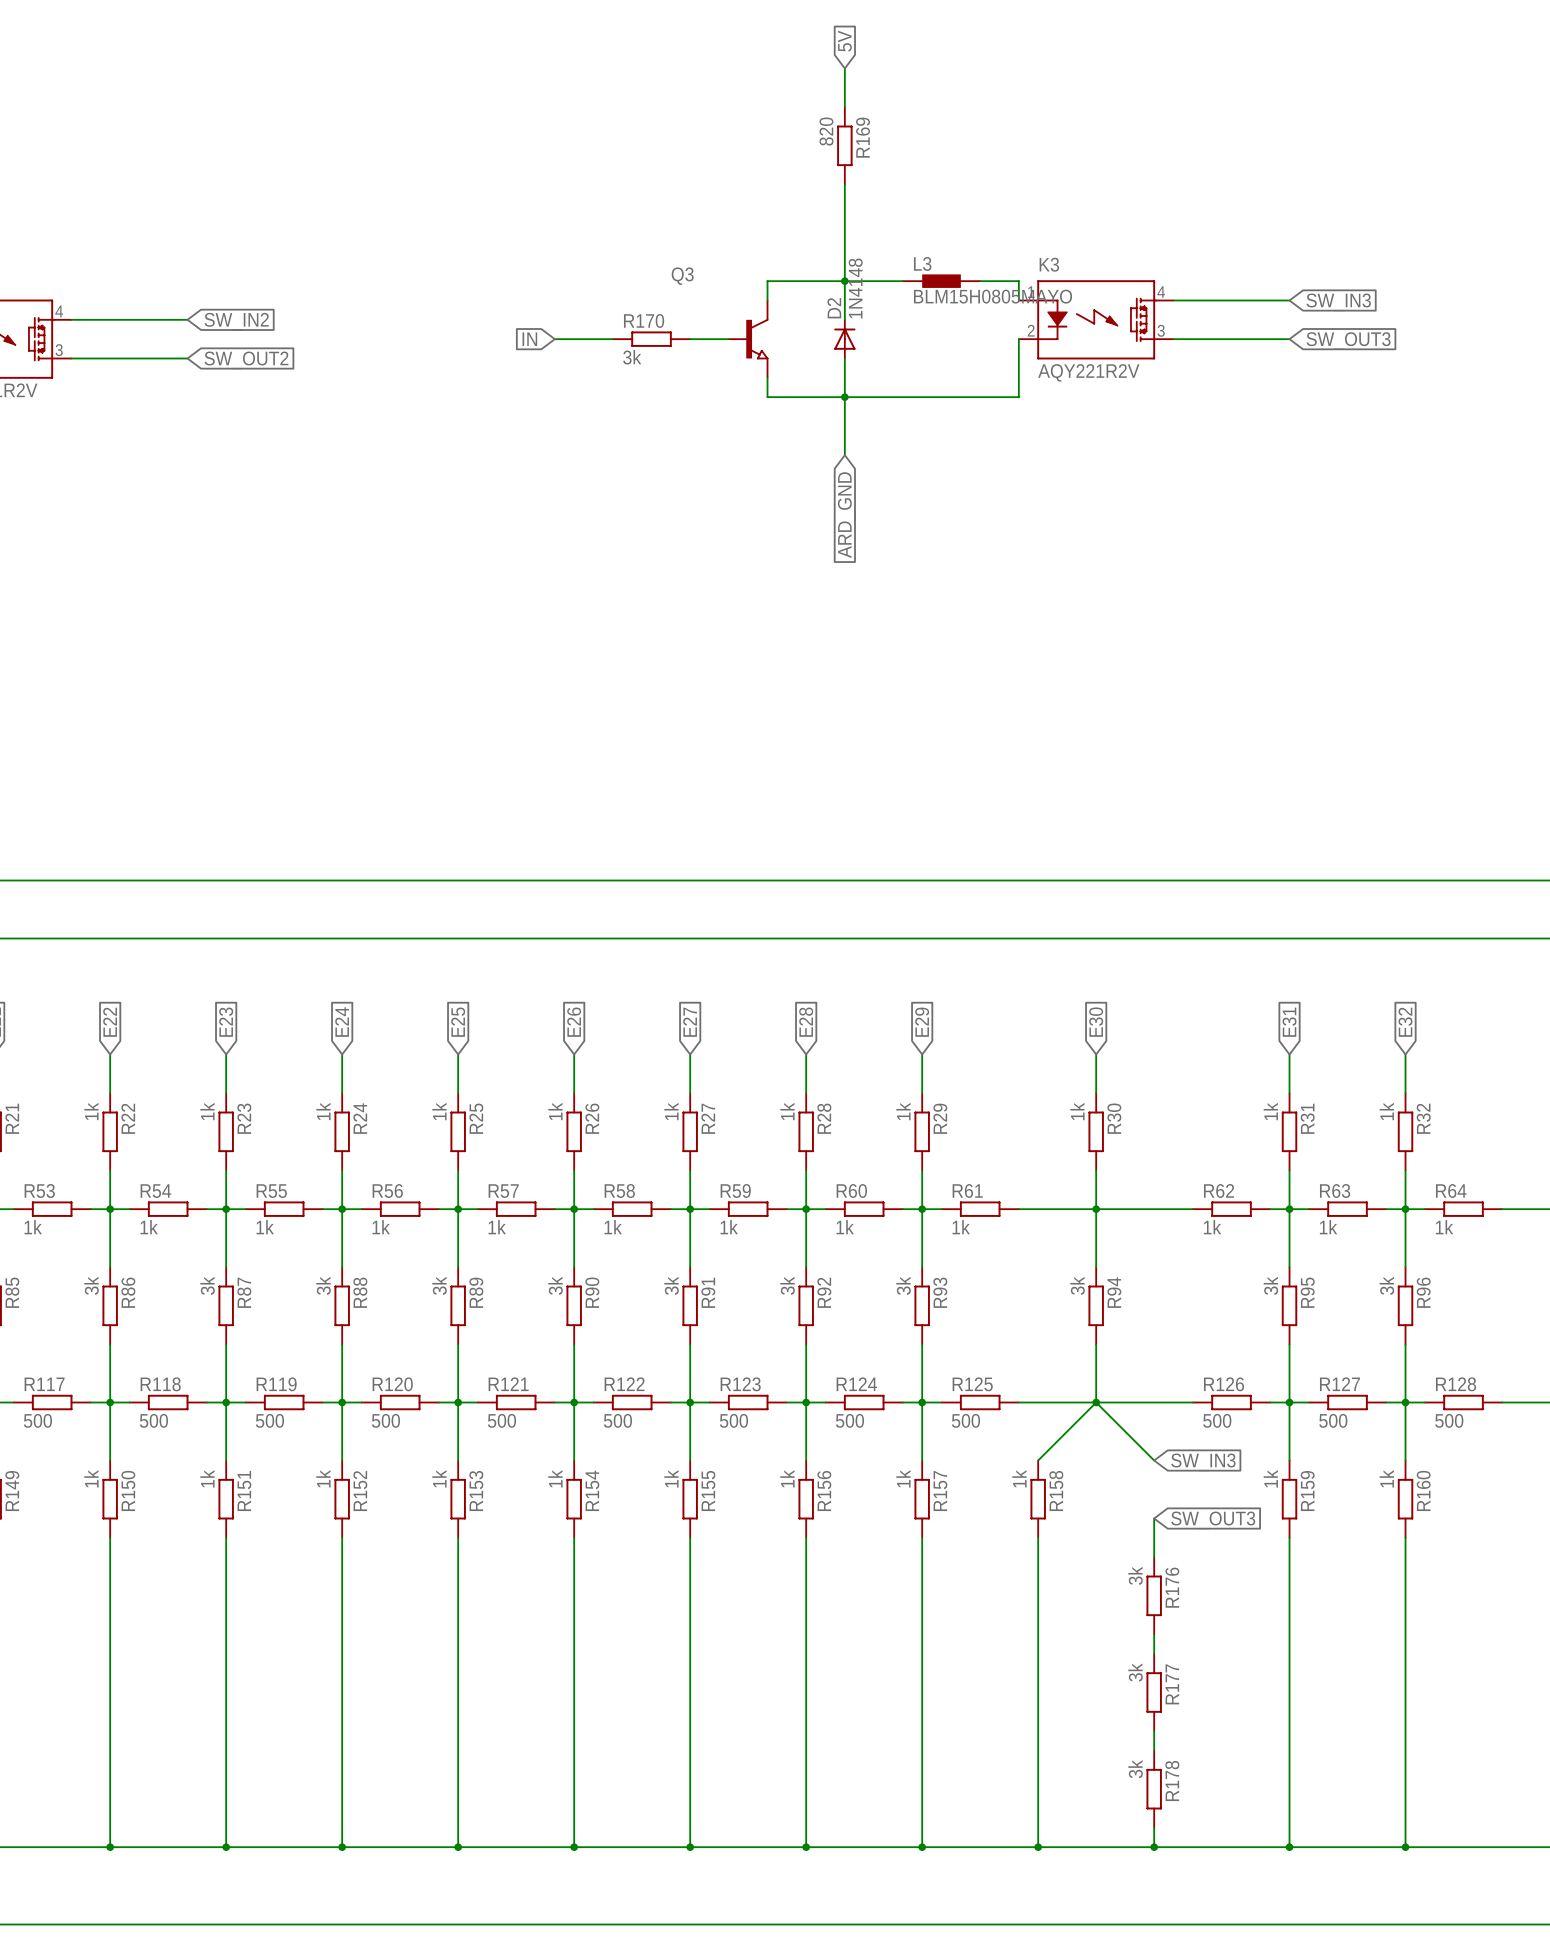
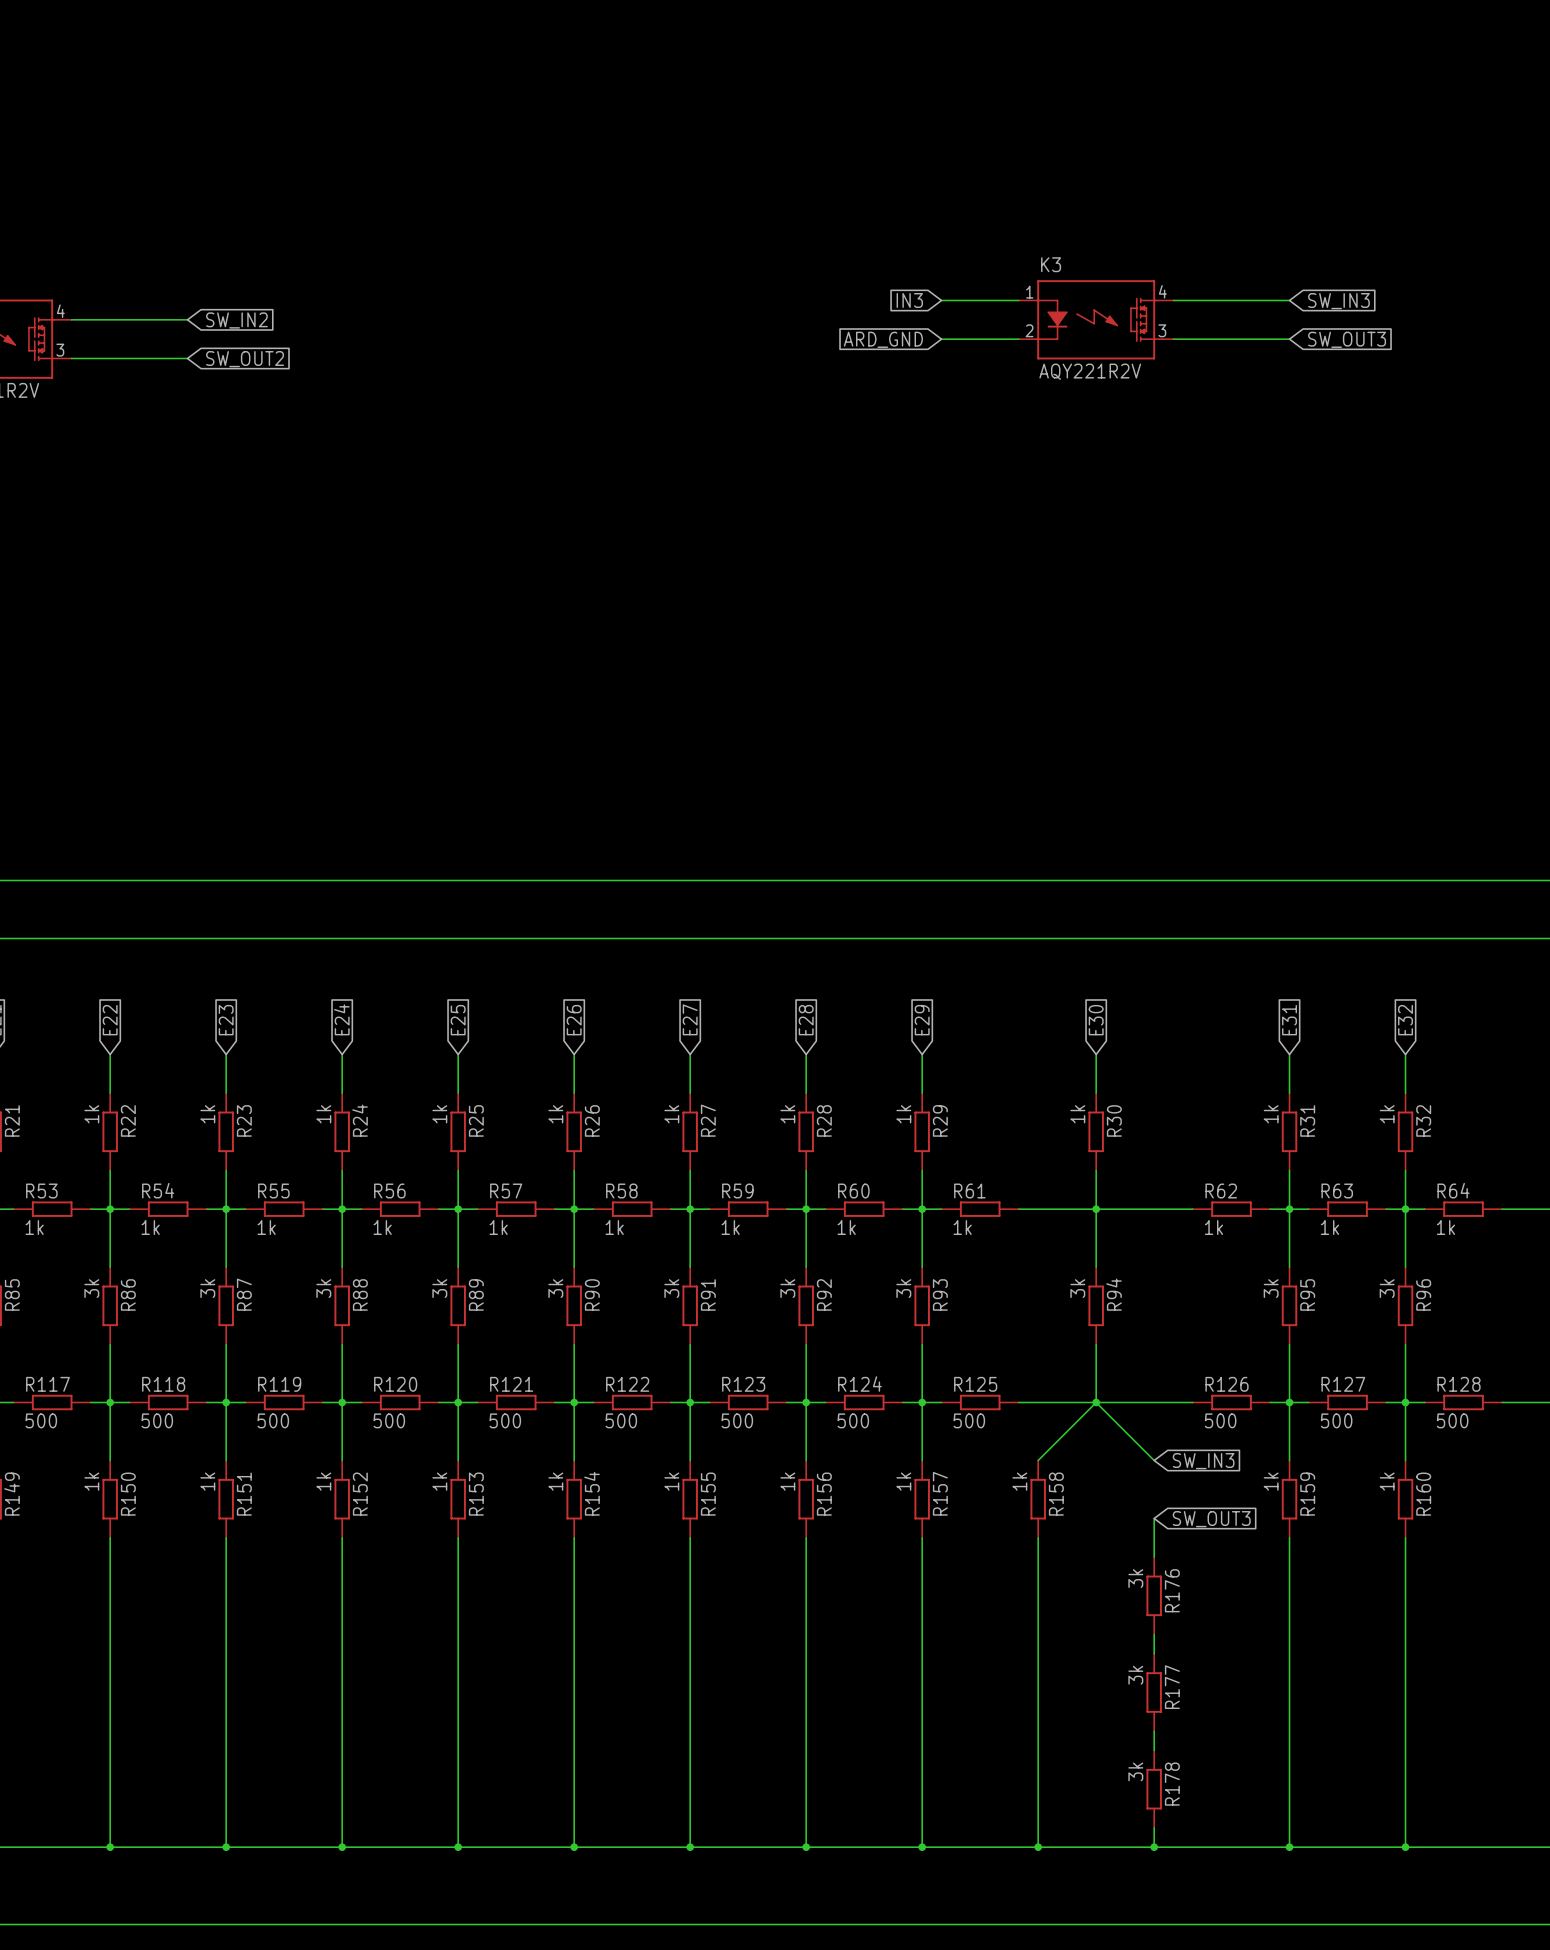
global label: 5V (844, 41) -> none
wire: (844, 68) (844, 107) -> none
R169: 820 (844, 145) -> none
wire: (844, 184) (844, 319) -> none
junction: (844, 281) -> none
wire: (902, 281) (767, 281) (767, 300) -> none
L3: BLM15H0805MAYO (941, 281) -> none
wire: (980, 281) (1018, 281) (1018, 300) -> (941, 300) (1018, 300)
global label: none -> IN3 (909, 300)
global label: IN (529, 339) -> none
wire: (554, 339) (612, 339) -> none
R170: 3k (651, 339) -> none
wire: (690, 339) (728, 339) -> none
Q3: (748, 339) -> none
D2: 1N4148 (844, 339) -> none
wire: (1018, 339) (1018, 397) (767, 397) (767, 377) -> (1018, 339) (941, 339)
wire: (844, 358) (844, 455) -> none
junction: (844, 397) -> none
global label rotation: 0° (846, 515) -> 90° clockwise (883, 339)
global label position: ARD_GND (846, 515) -> ARD_GND (883, 339)

